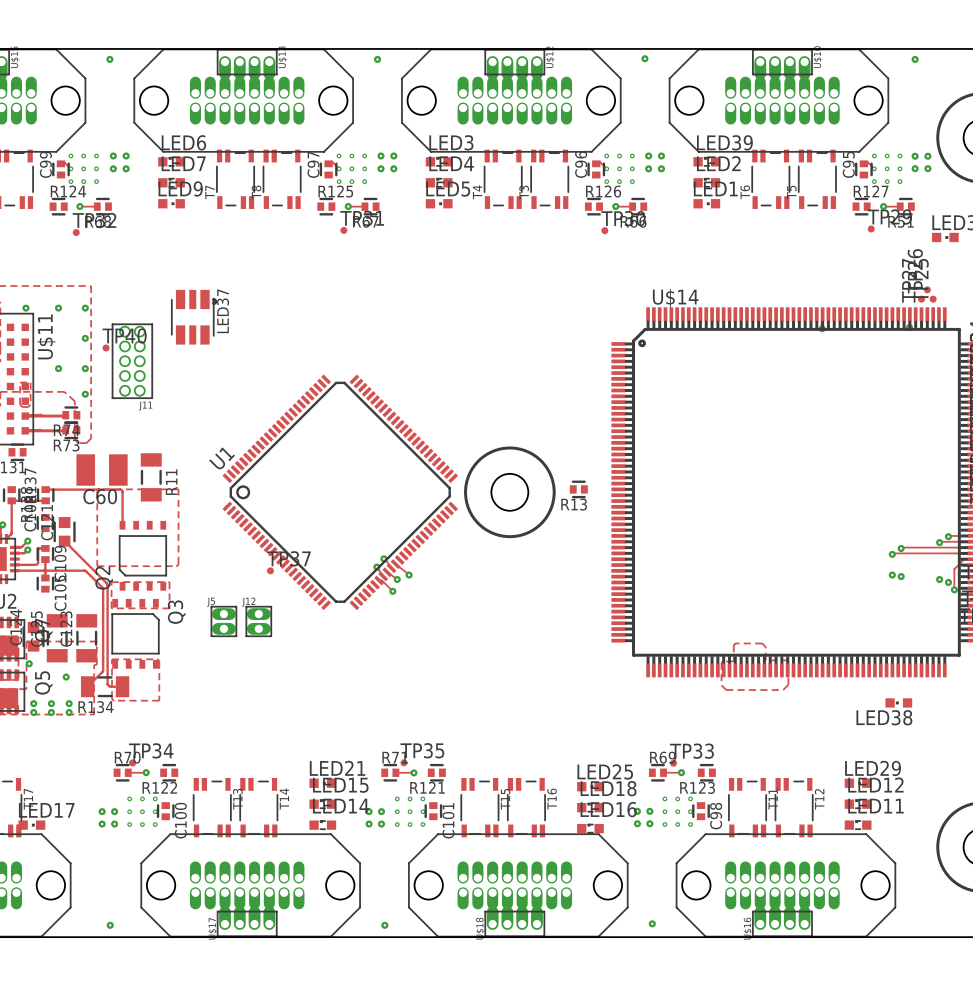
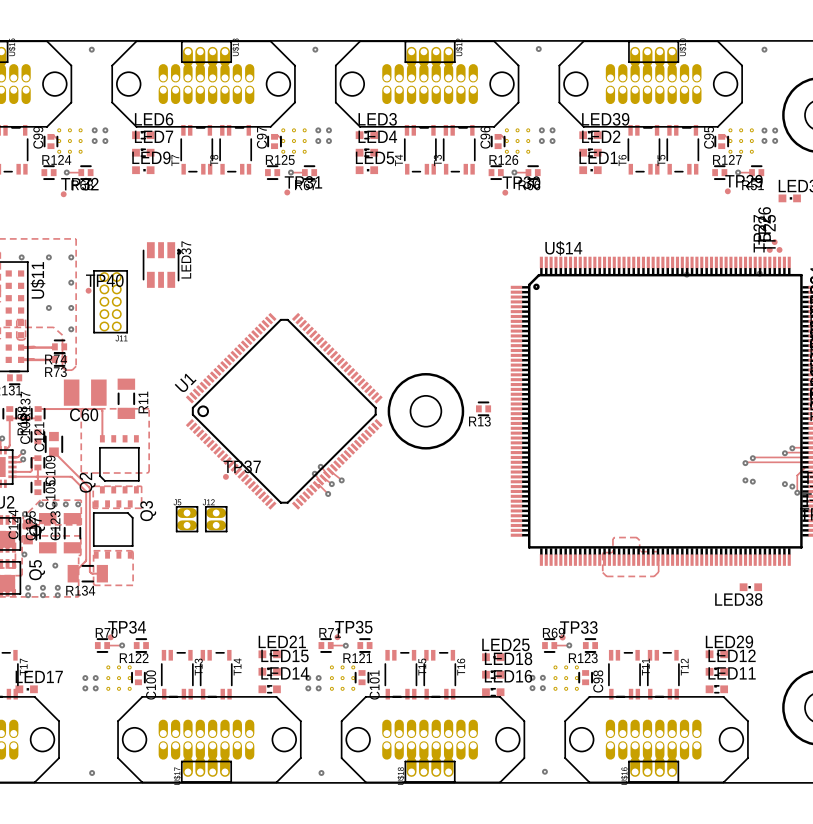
zone outline: none -> (40, 500) (81, 500) (81, 524) (33, 524) (33, 528) (23, 528) (23, 512) (28, 512) (40, 500)
via: none -> (41, 504)
via: none -> (54, 504)
via: none -> (65, 504)
via: none -> (78, 504)
via: none -> (25, 514)

